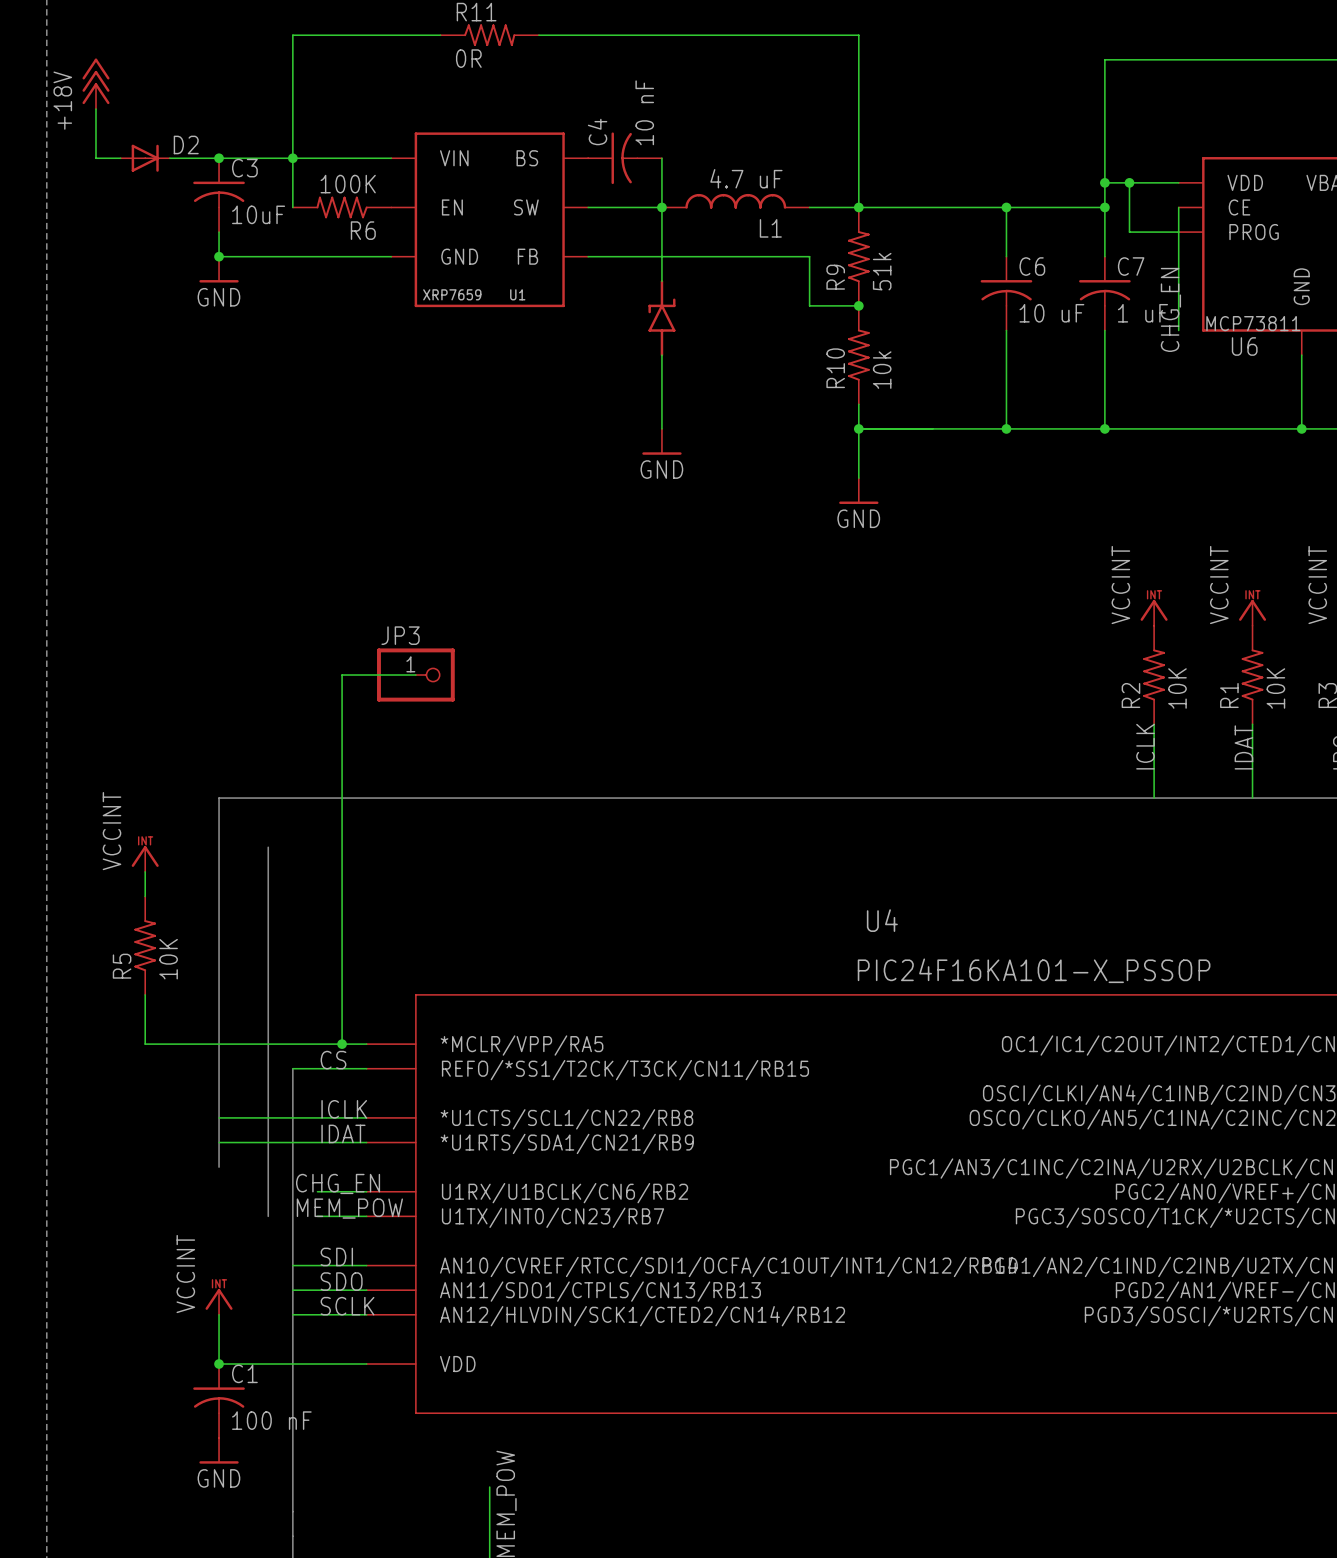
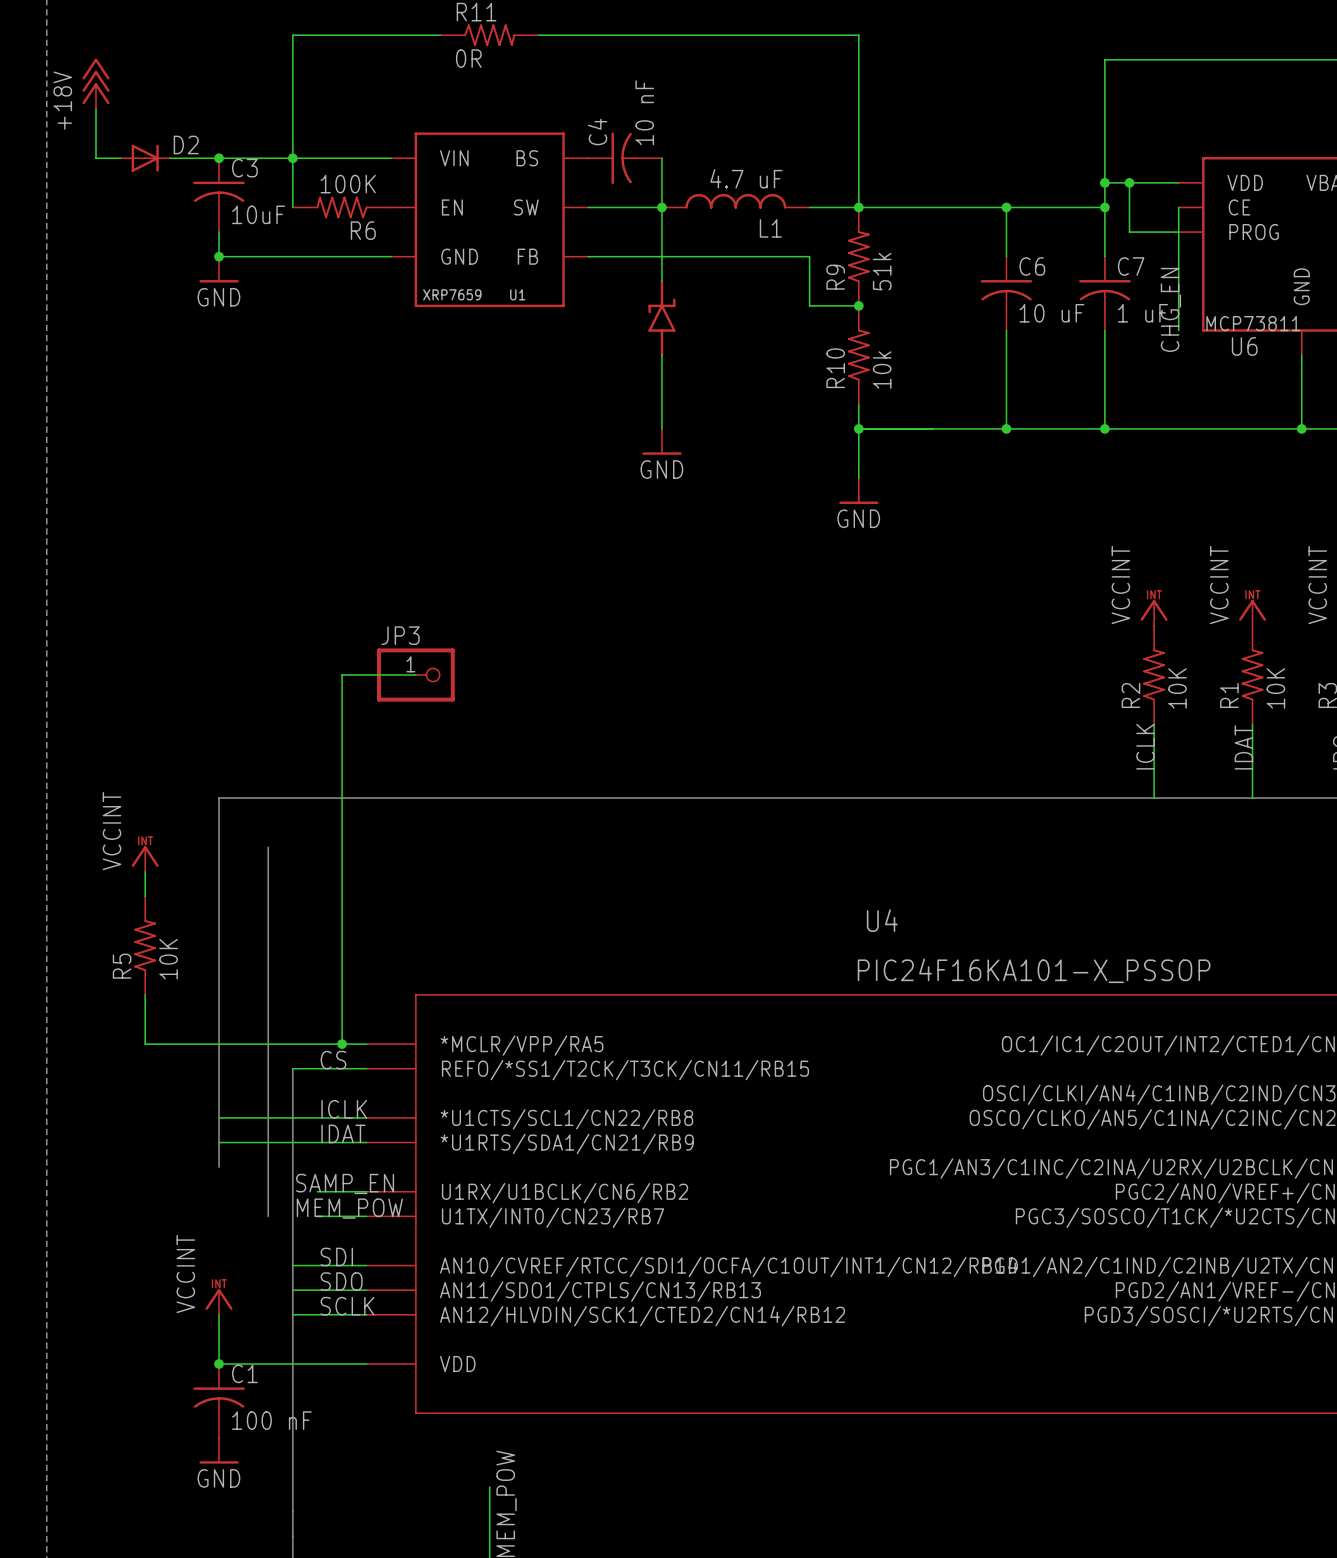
label: CHG_EN (338, 1183) -> SAMP_EN (345, 1183)

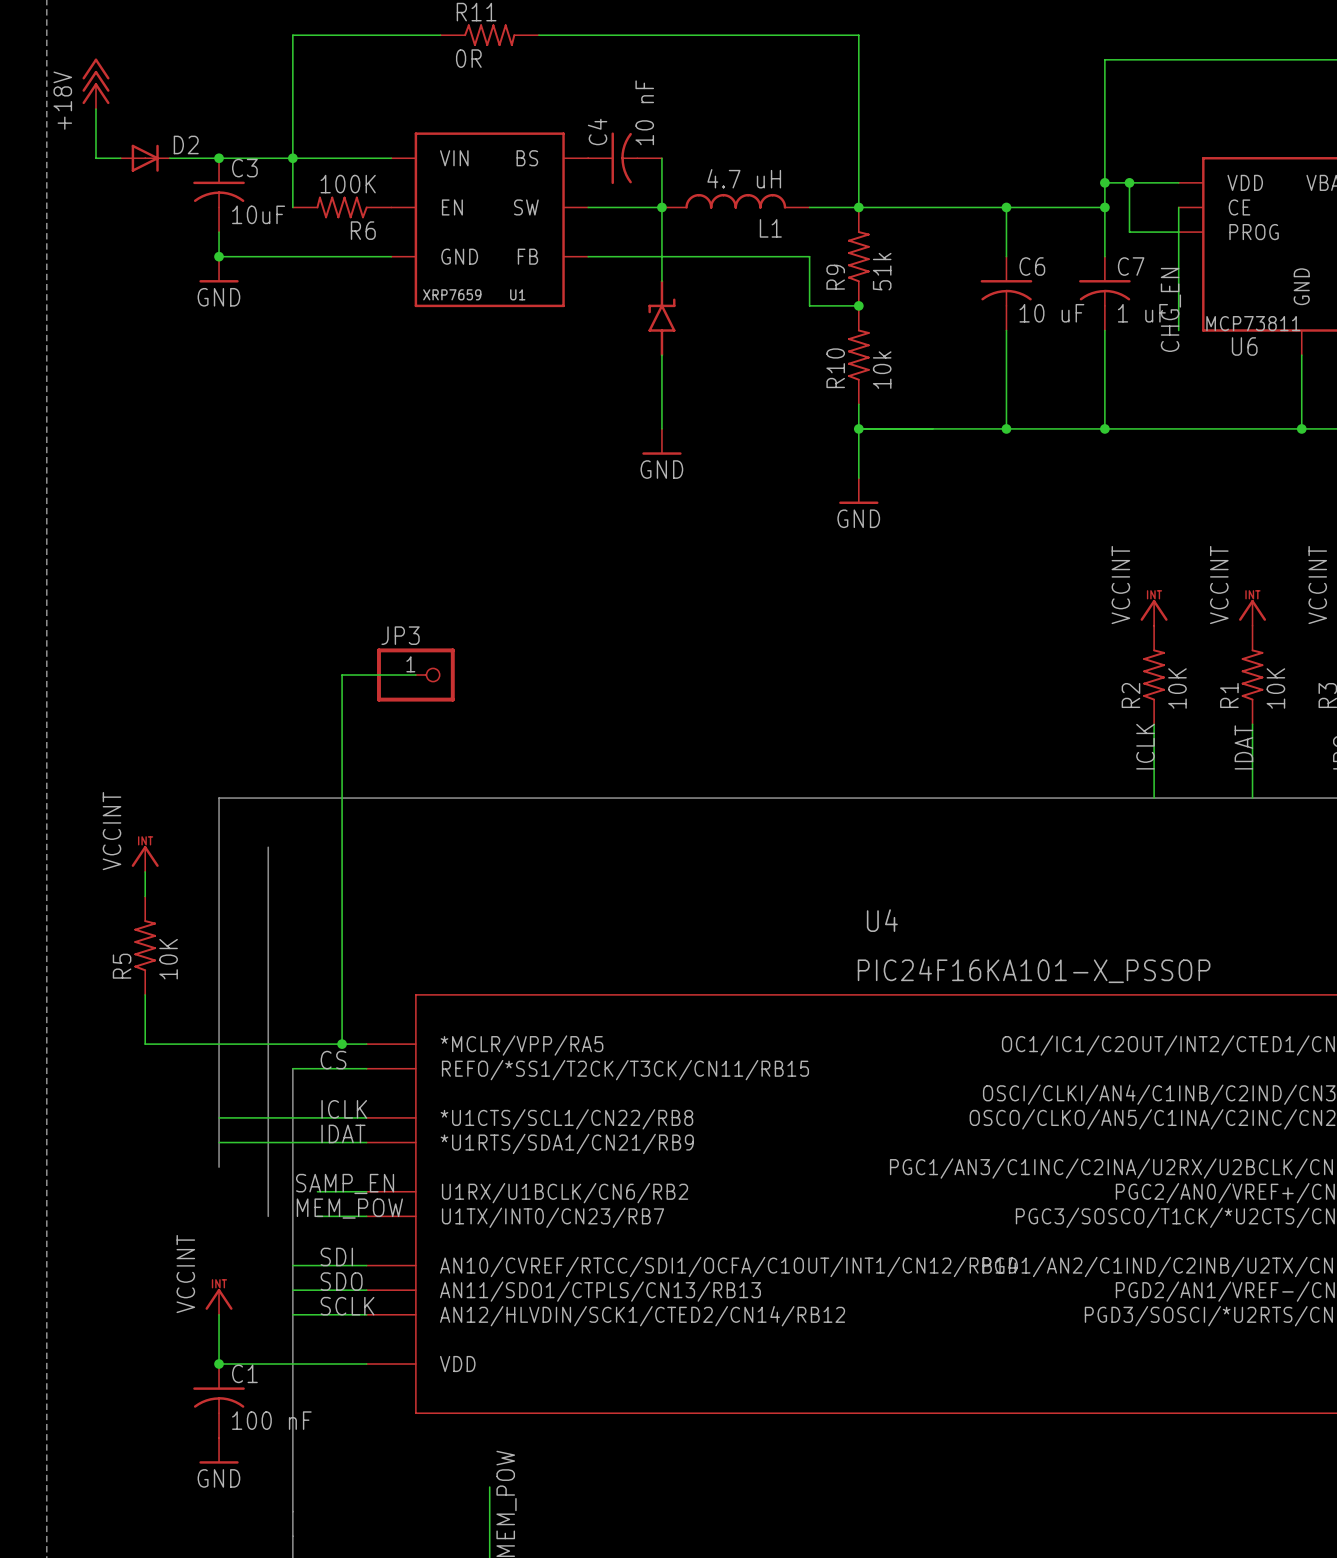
L1 value: 4.7 uF (746, 178) -> 4.7 uH (744, 178)

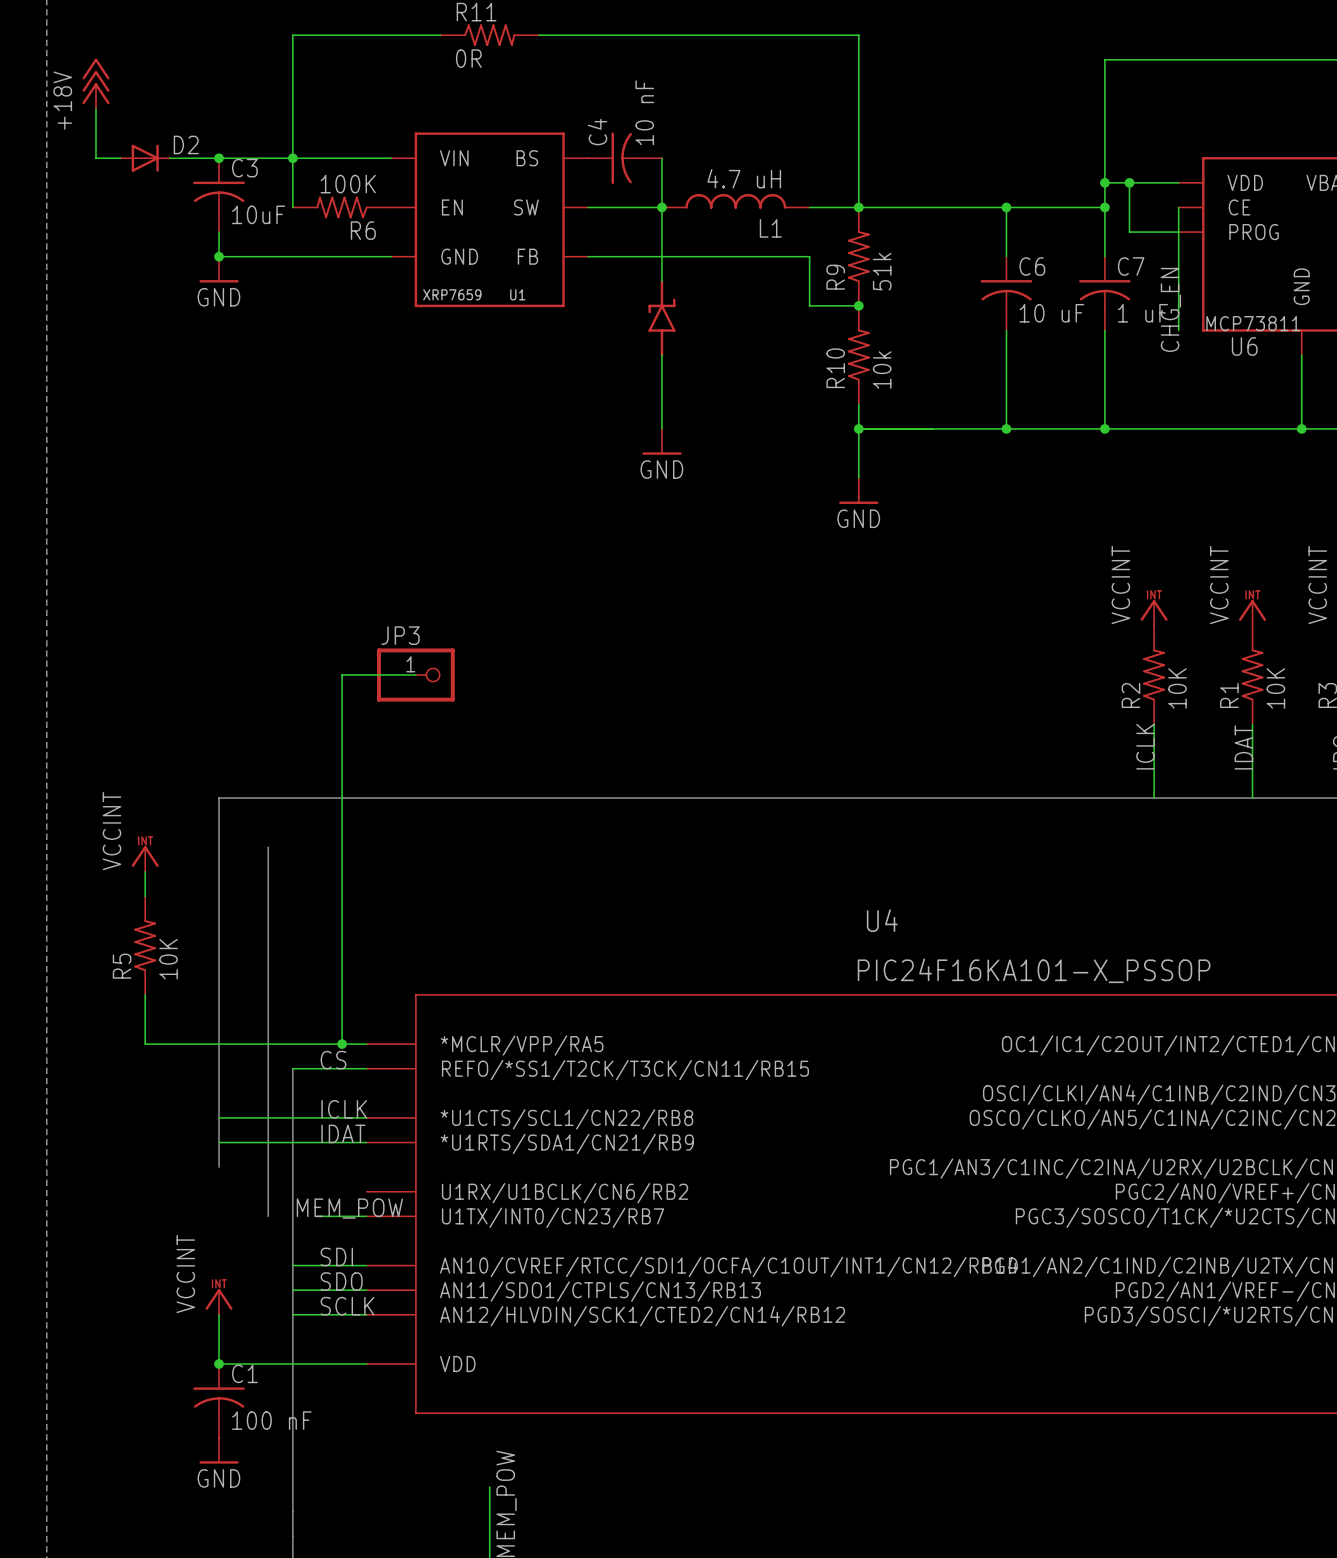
label: SAMP_EN (345, 1183) -> none
wire: (317, 1191) (366, 1191) -> none

